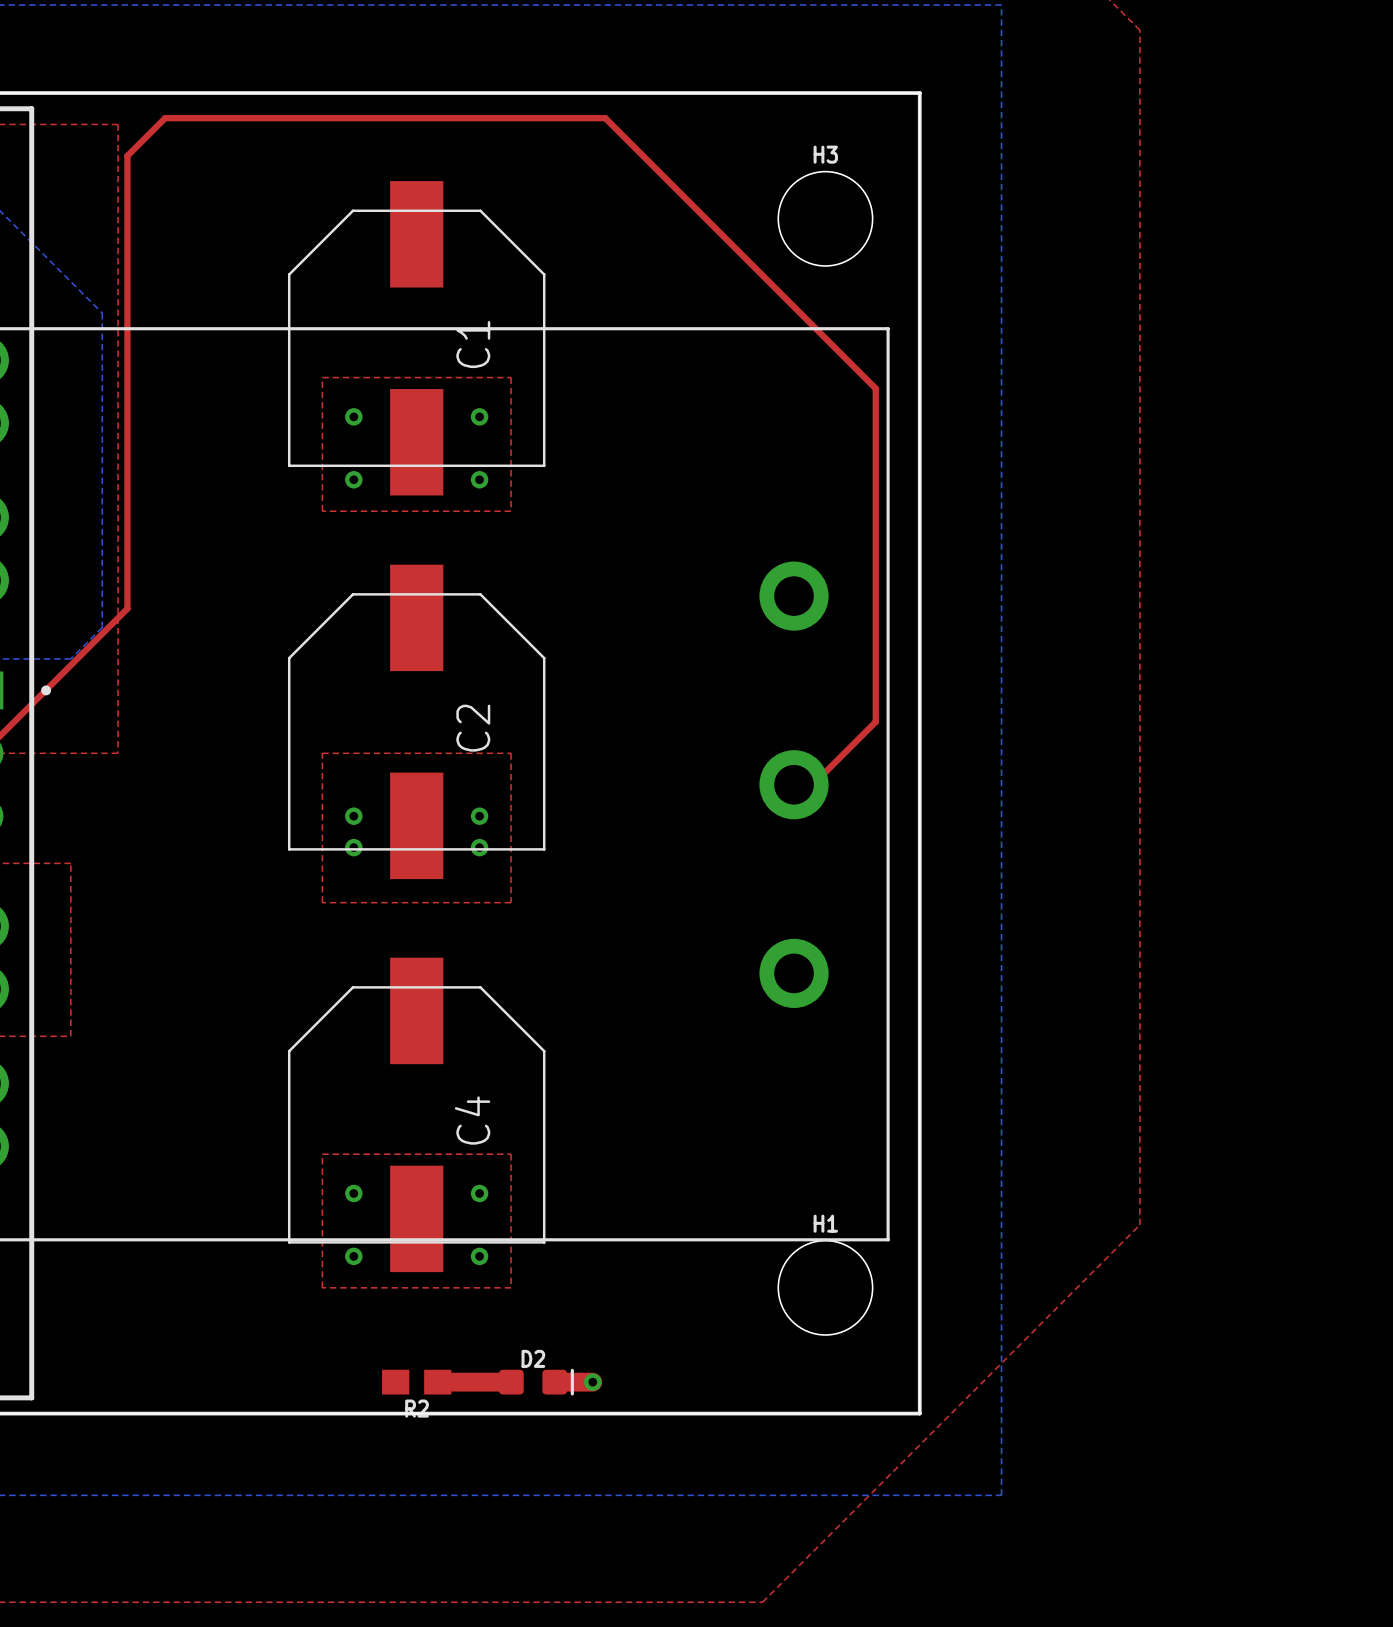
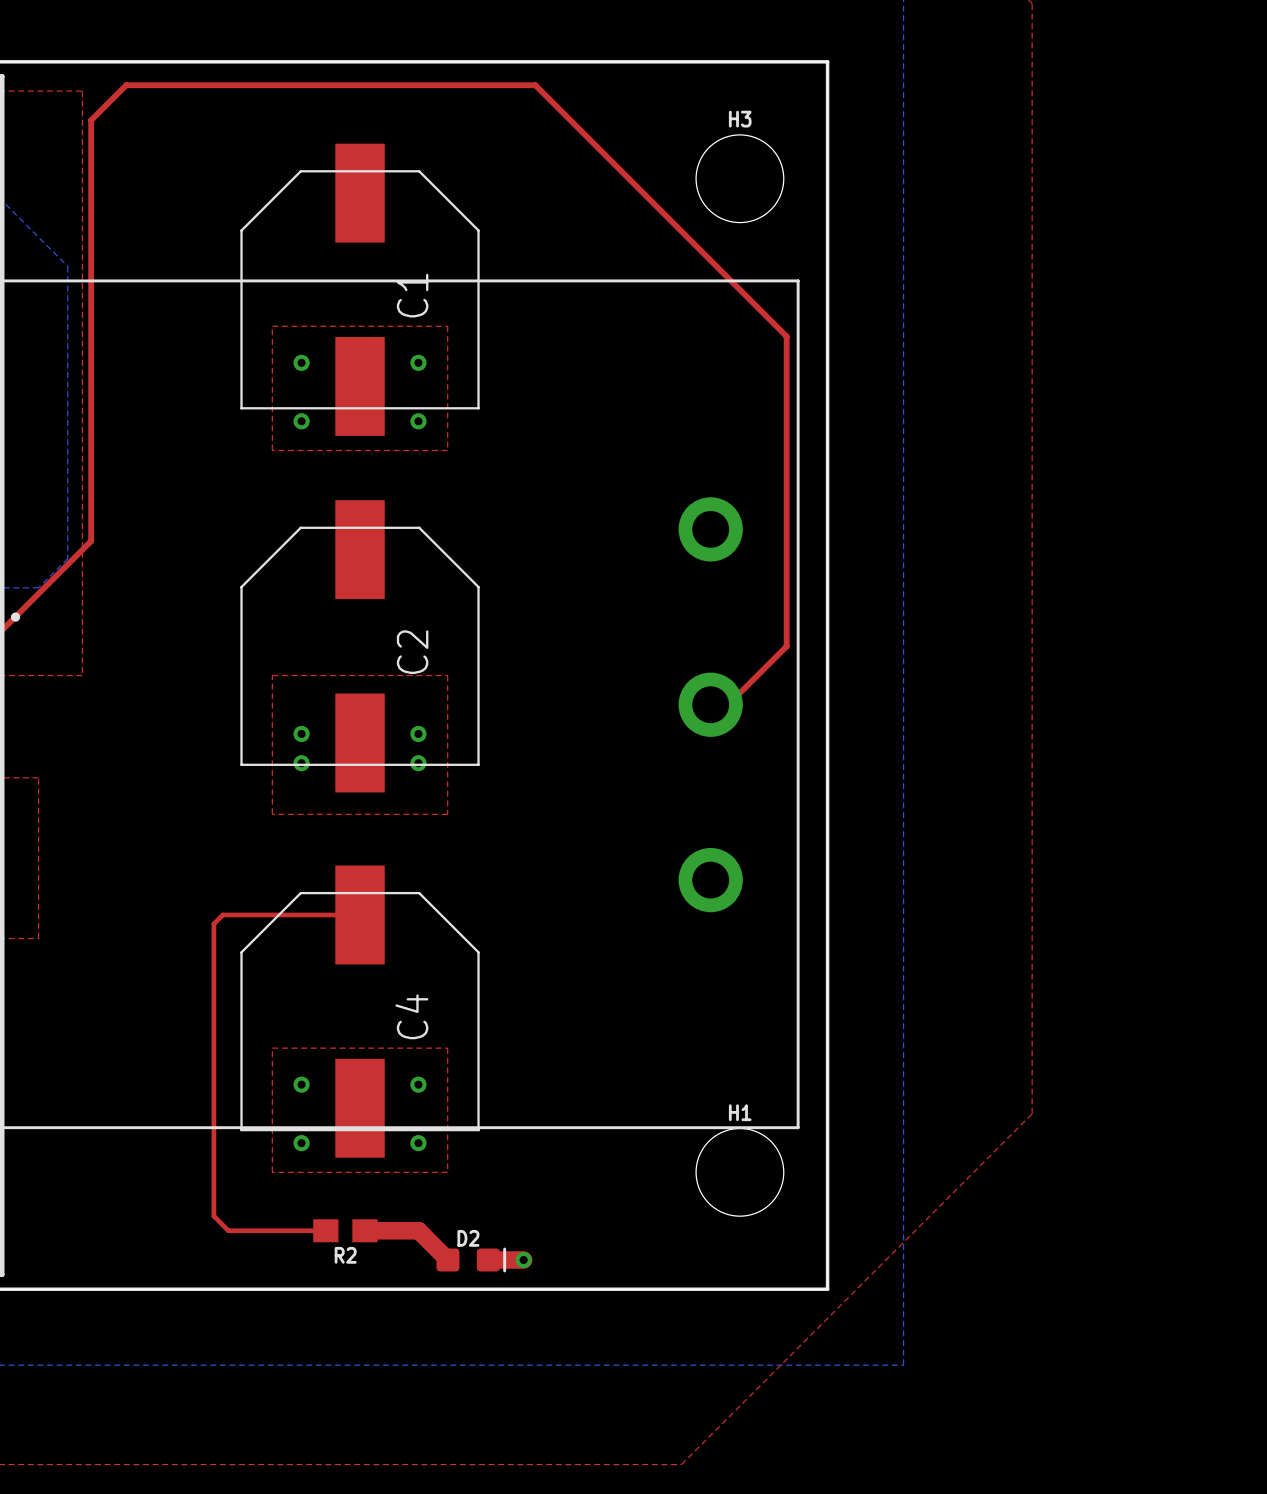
top track: none -> (360, 914) (222, 914) (213, 923) (213, 1216) (228, 1230) (325, 1230)
R2 position: (416, 1382) -> (345, 1230)
top track: (437, 1382) (511, 1382) -> (364, 1230) (418, 1230) (447, 1260)

